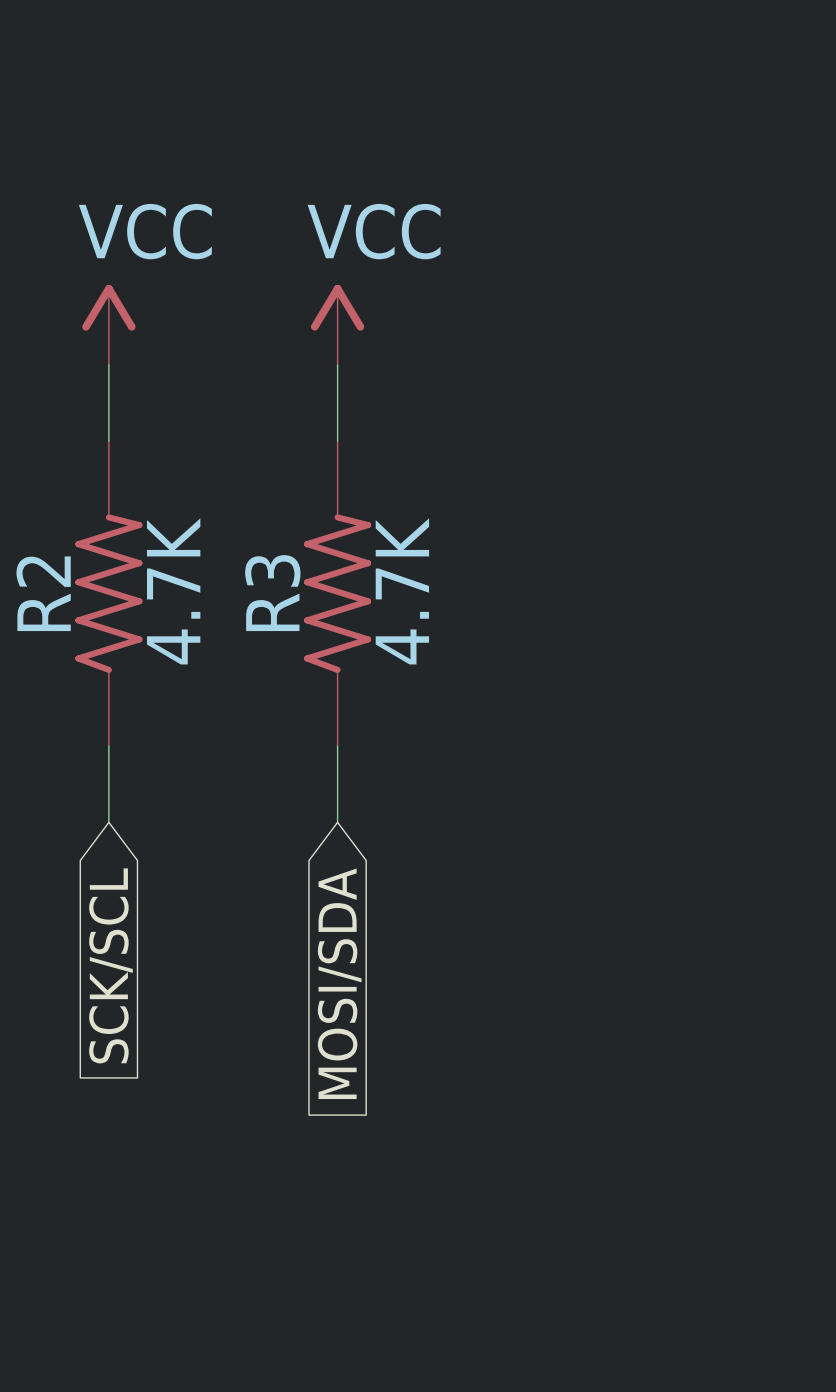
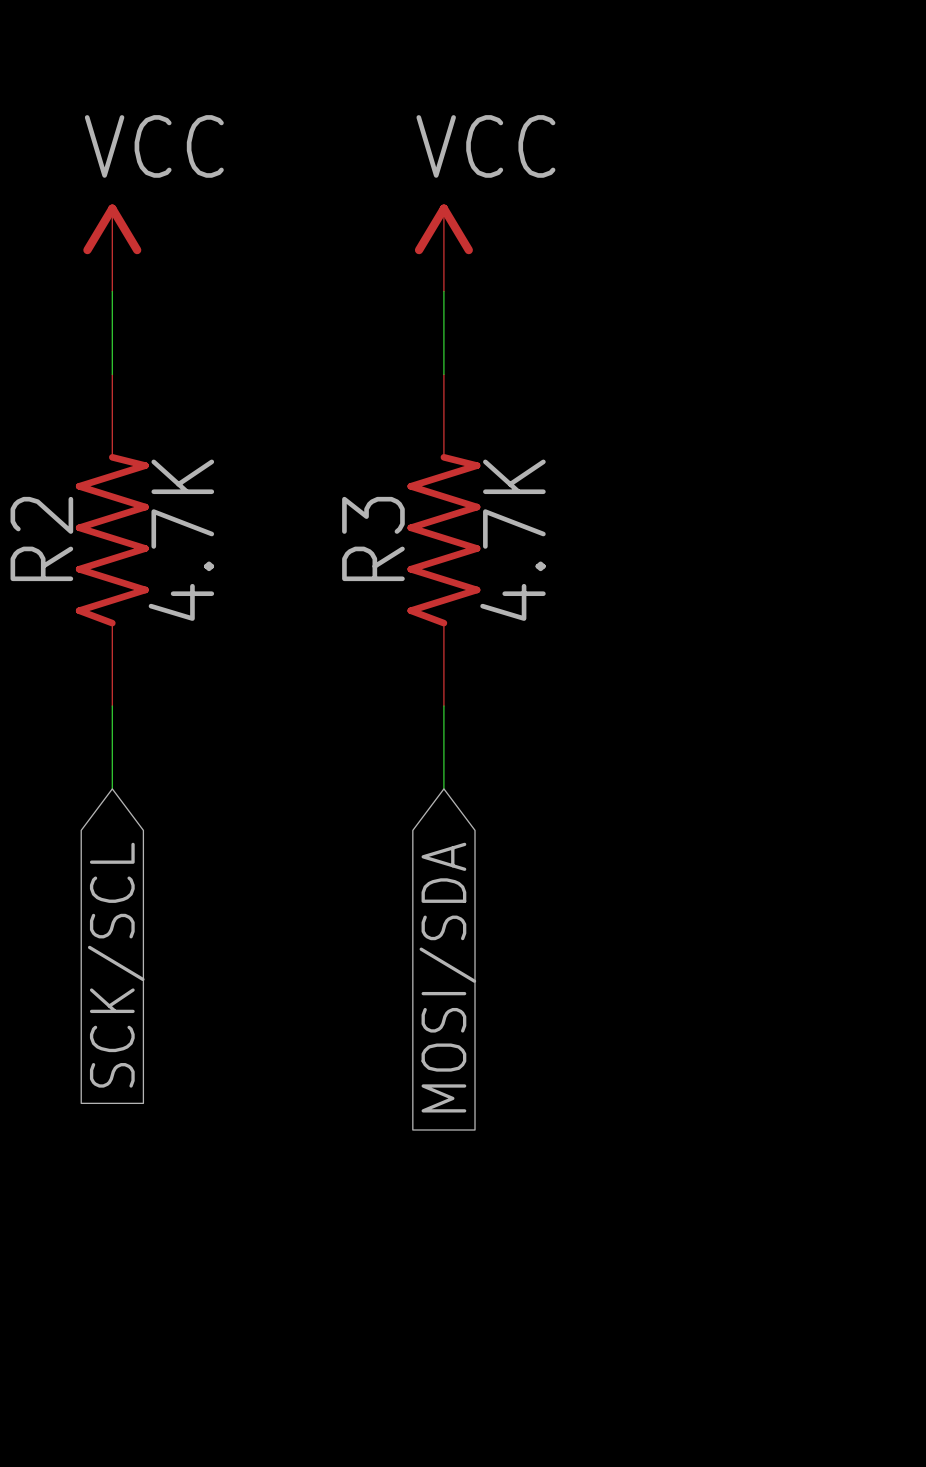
power symbol position: VCC (337, 324) -> VCC (443, 248)
wire: (337, 364) (337, 441) -> (443, 291) (443, 374)
R3 position: (337, 593) -> (443, 540)
wire: (337, 746) (337, 822) -> (443, 706) (443, 788)
global label position: MOSI/SDA (339, 983) -> MOSI/SDA (447, 977)

